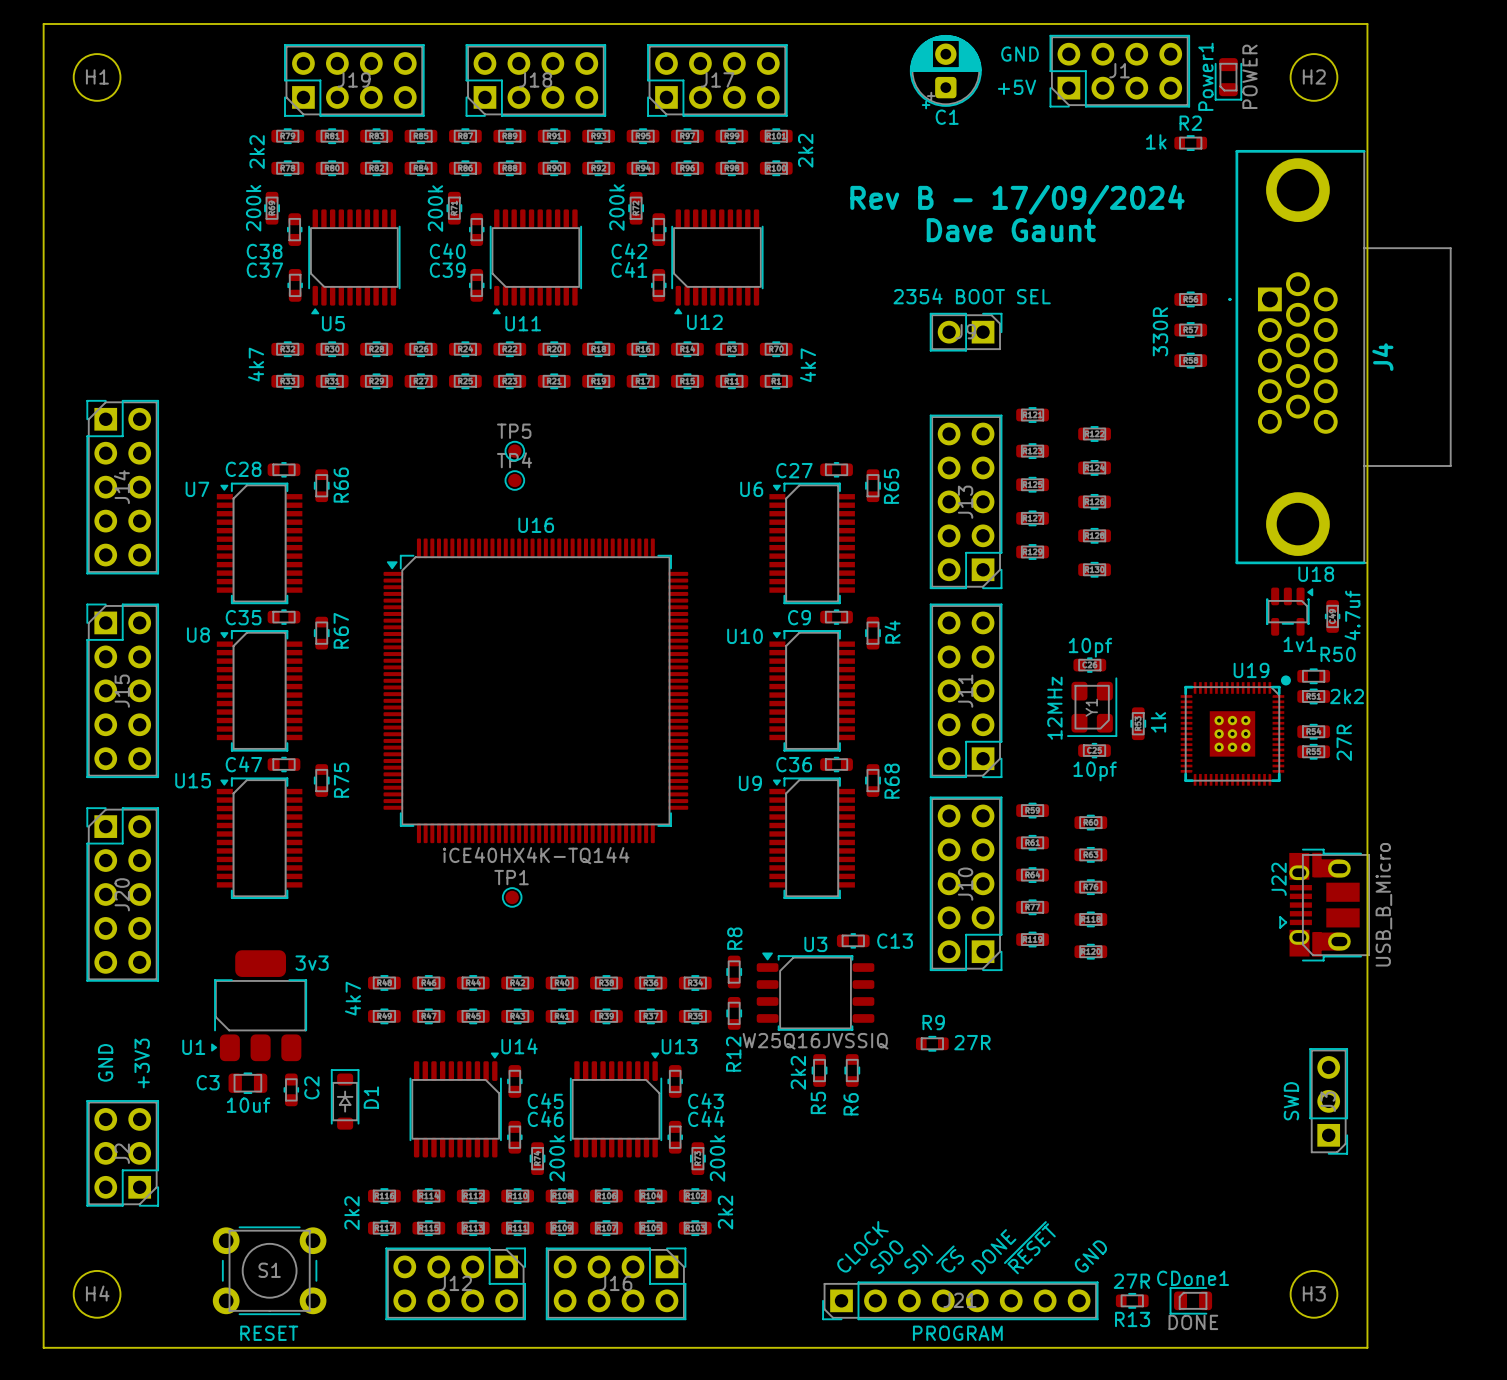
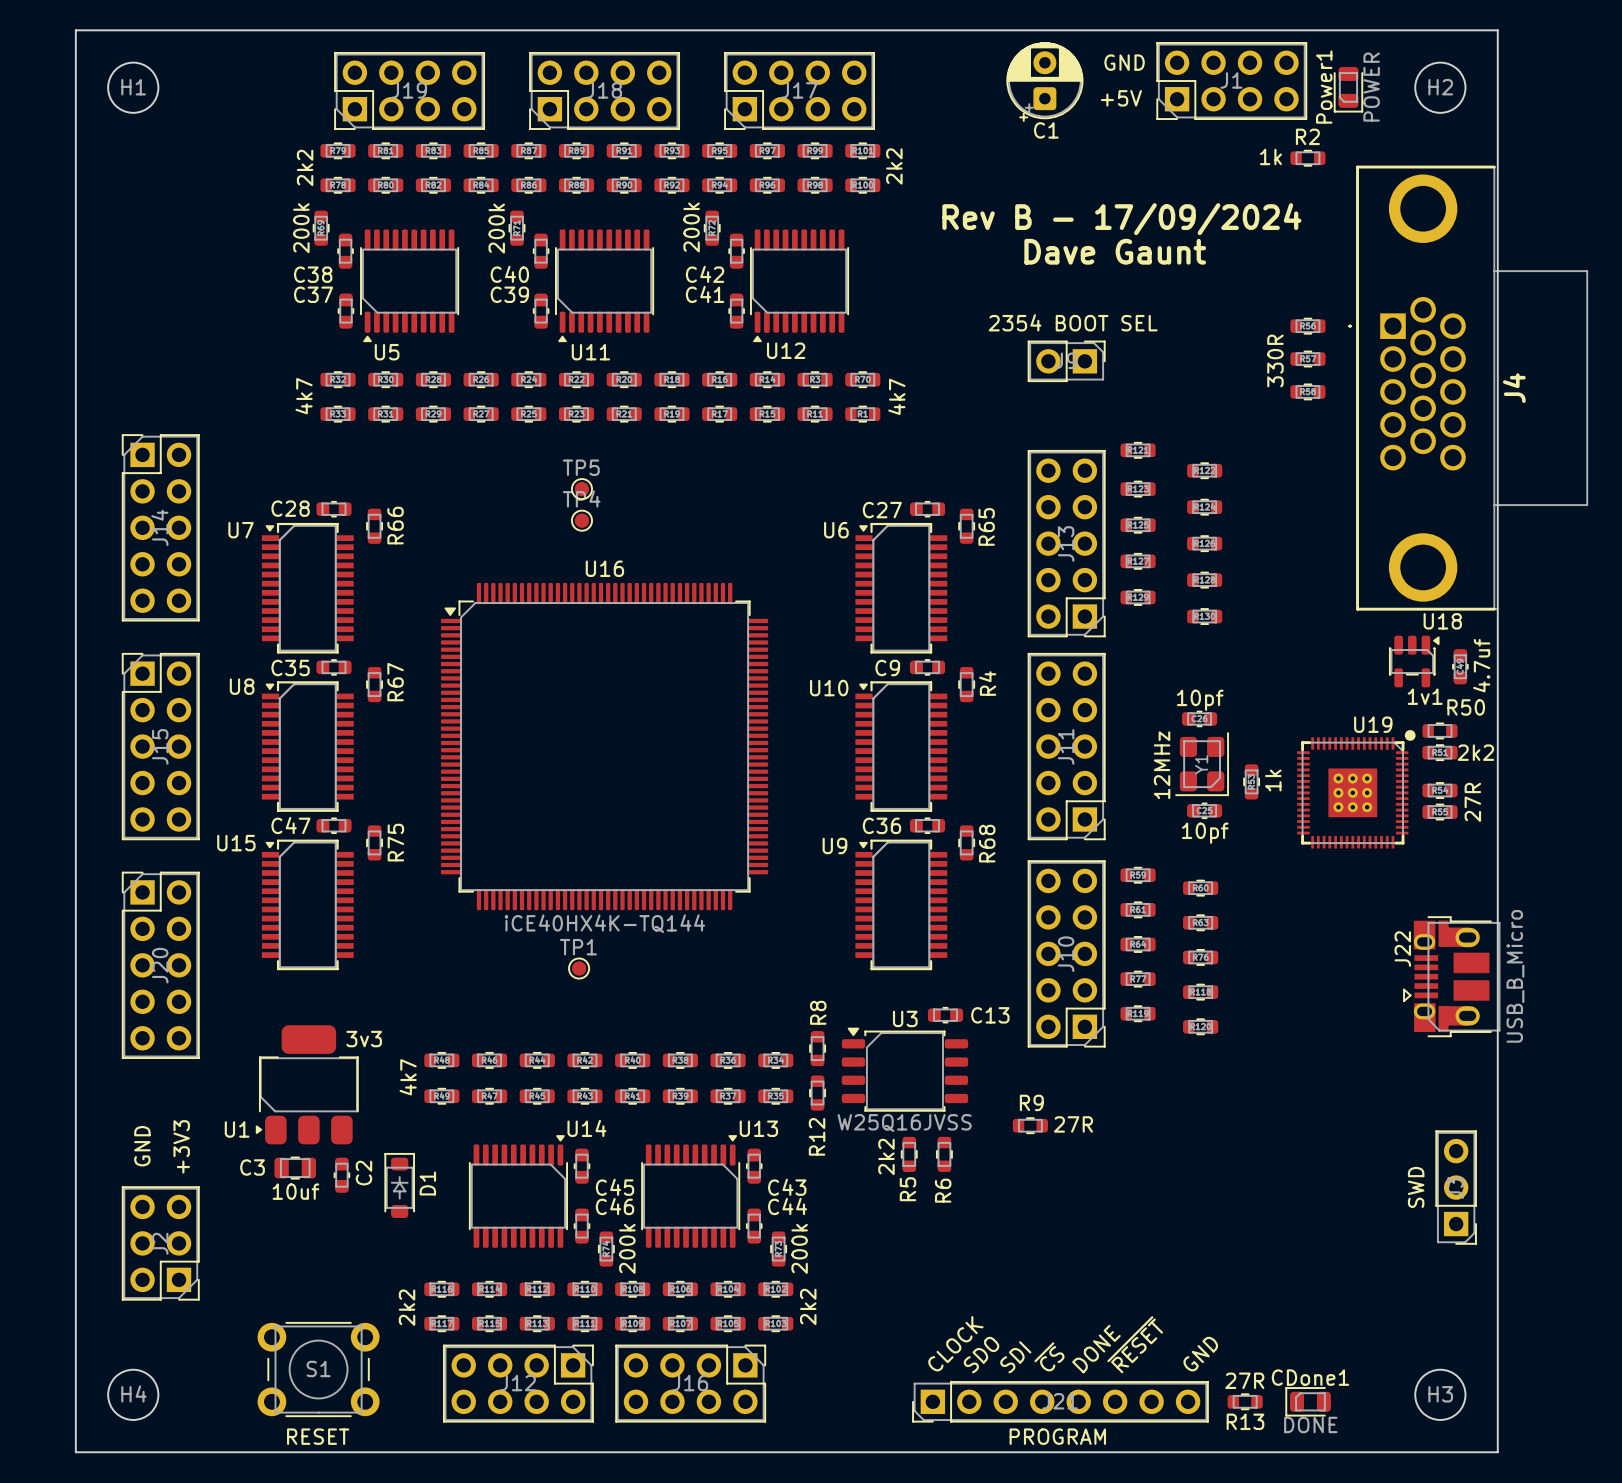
U3 value: W25Q16JVSSIQ (815, 1041) -> W25Q16JVSS (904, 1122)

